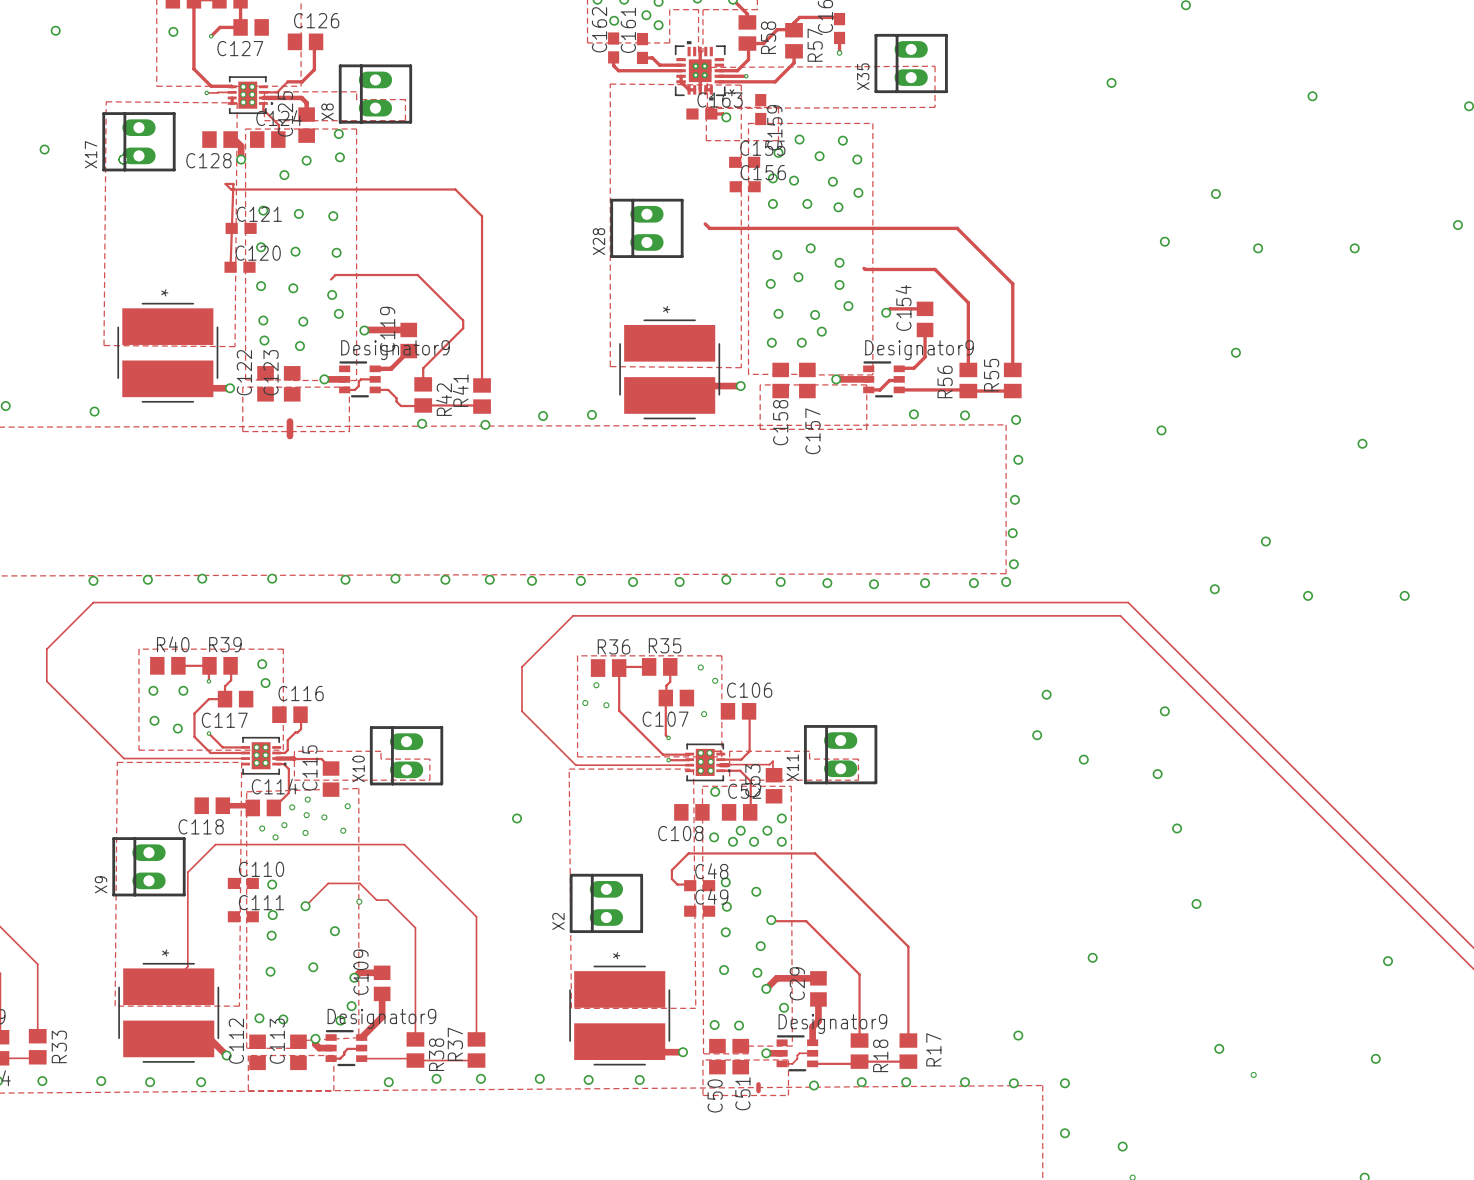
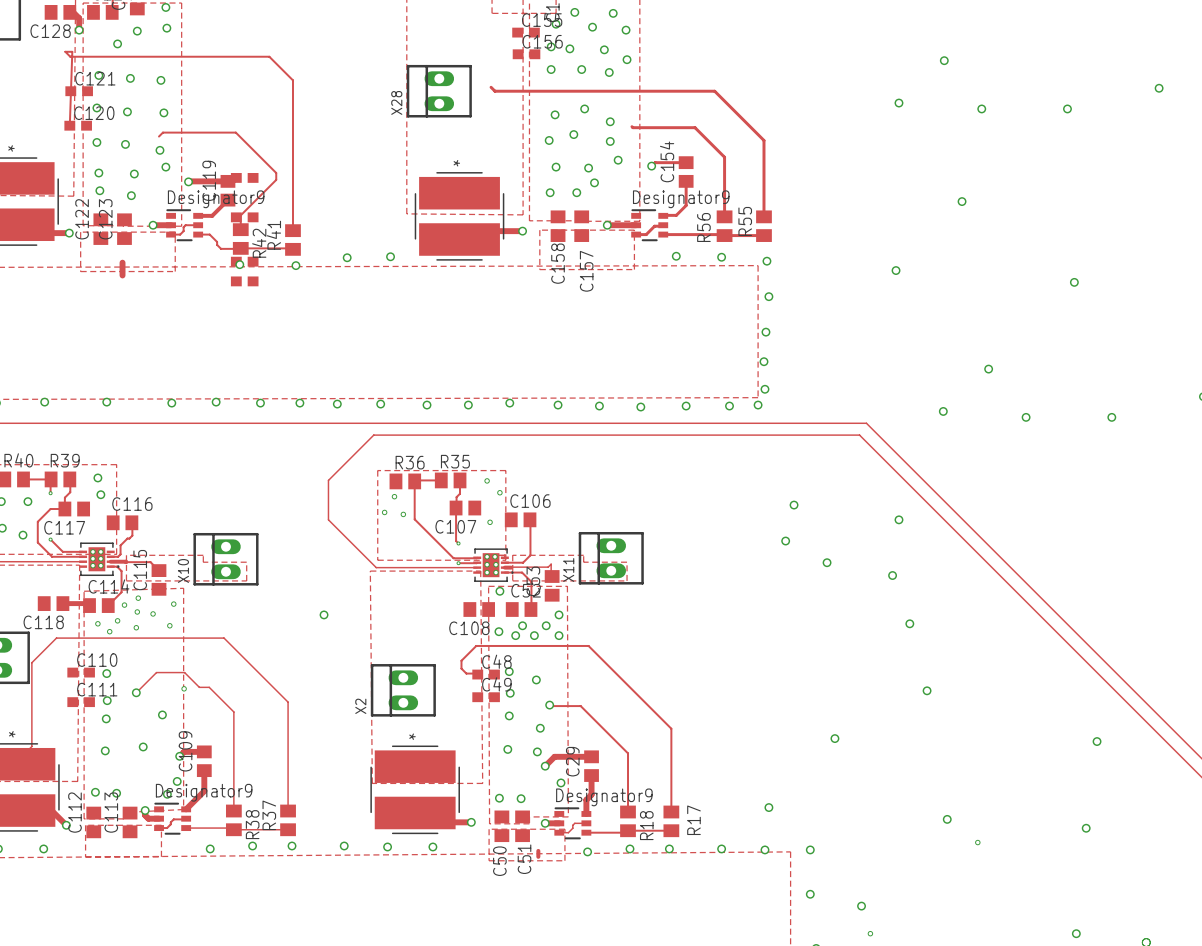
part: none -> (244, 177)
part: none -> (244, 217)
part: none -> (244, 261)
part: none -> (244, 281)

